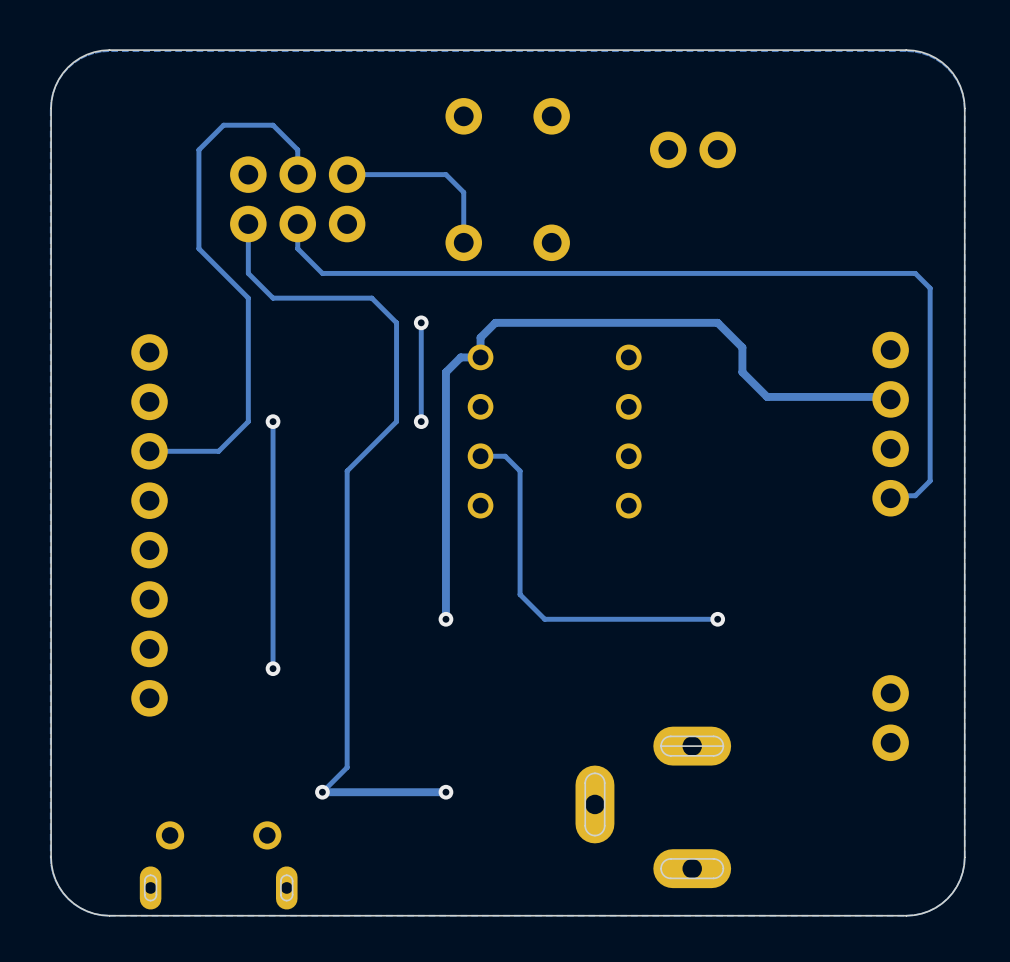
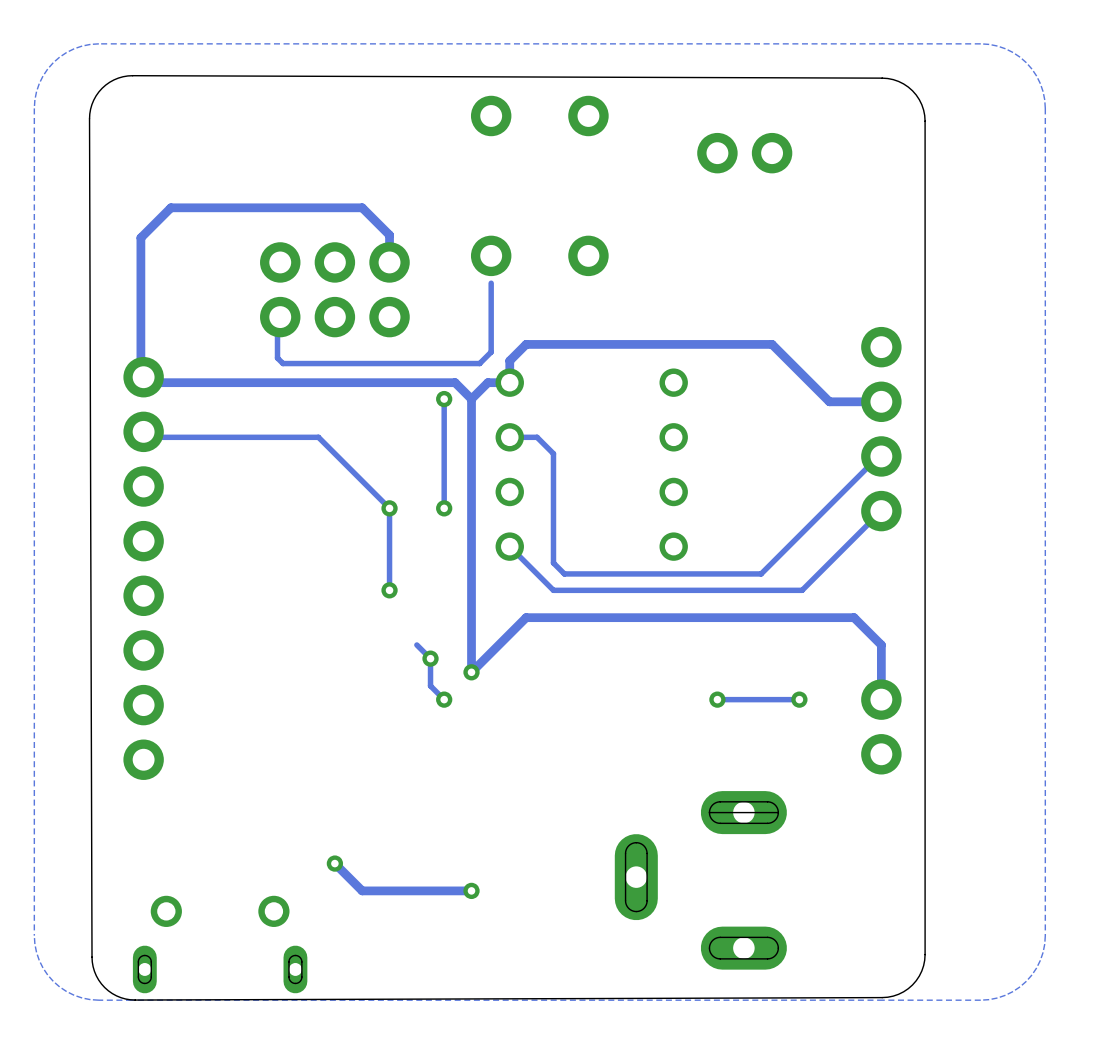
board edge: (906, 50) (109, 50) (87, 54) (68, 67) (55, 86) (51, 108) (51, 857) (55, 879) (68, 898) (87, 911) (109, 915) (906, 915) (928, 911) (947, 898) (960, 879) (964, 857) (964, 108) (960, 86) (947, 67) (928, 54) (906, 50) -> (132, 75) (882, 78) (898, 81) (916, 95) (923, 110) (925, 121) (925, 954) (921, 971) (908, 988) (893, 996) (882, 997) (135, 1000) (116, 995) (101, 983) (94, 971) (92, 957) (89, 118) (91, 104) (102, 88) (118, 78) (132, 75)
track: (297, 174) (297, 149) (273, 125) (223, 125) (198, 149) (198, 248) (248, 298) (248, 421) (218, 451) (149, 451) -> none
track: (347, 174) (445, 174) (463, 192) (463, 242) -> none
part position: (297, 199) -> (334, 289)
track: (248, 224) (248, 273) (273, 298) (371, 298) (396, 322) (396, 421) (347, 471) (347, 767) (322, 792) (445, 792) -> none
track: (297, 224) (297, 248) (322, 273) (915, 273) (930, 288) (930, 480) (915, 495) (893, 495) (890, 498) -> none
track: none -> (389, 262) (389, 235) (362, 207) (170, 207) (140, 237) (140, 382) (455, 382) (471, 399)
track: none -> (491, 283) (491, 352) (479, 363) (282, 363) (277, 358) (277, 319) (280, 317)
track: (421, 322) (421, 372) -> (444, 453) (444, 508)
via: (421, 322) -> none
track: (742, 347) (742, 372) (767, 396) (888, 396) (890, 399) -> (799, 371) (829, 401) (881, 401)
via: none -> (444, 399)
track: none -> (140, 437) (318, 437) (389, 508) (389, 590)
track: (273, 421) (273, 668) -> none
via: (273, 421) -> none
via: (421, 421) -> none
part position: (890, 424) -> (881, 429)
track: (480, 456) (505, 456) (520, 471) -> (509, 437) (537, 437) (553, 453) (553, 508)
via: none -> (389, 508)
via: none -> (444, 508)
track: none -> (884, 508) (802, 590) (553, 590) (509, 546)
track: (520, 520) (520, 594) (544, 619) (717, 619) -> (553, 563) (564, 573) (761, 573) (878, 456) (881, 456)
via: none -> (389, 590)
track: none -> (416, 644) (430, 658) (430, 685) (444, 699)
via: none -> (430, 658)
track: none -> (471, 672) (526, 617) (854, 617) (881, 644) (881, 699)
via: (717, 619) -> none
via: none -> (444, 699)
via: none -> (717, 699)
track: none -> (799, 699) (717, 699)
via: none -> (799, 699)
via: (273, 668) -> none
part position: (890, 718) -> (881, 726)
track: none -> (334, 863) (362, 890) (471, 890)
via position: (445, 792) -> (471, 890)

